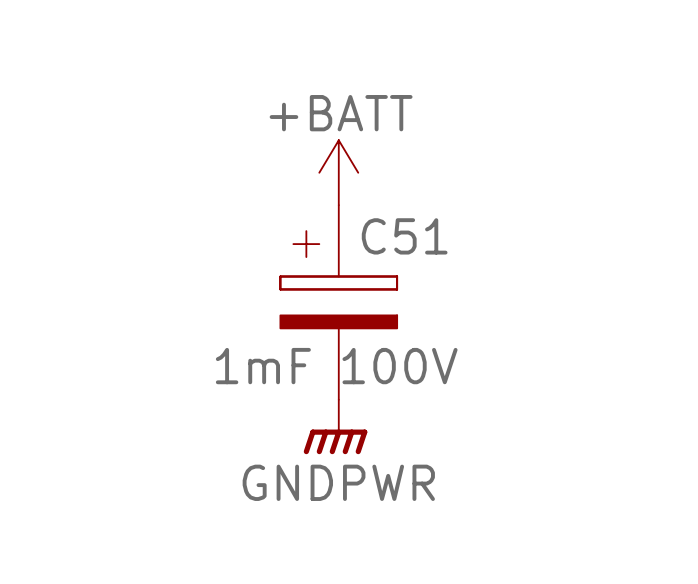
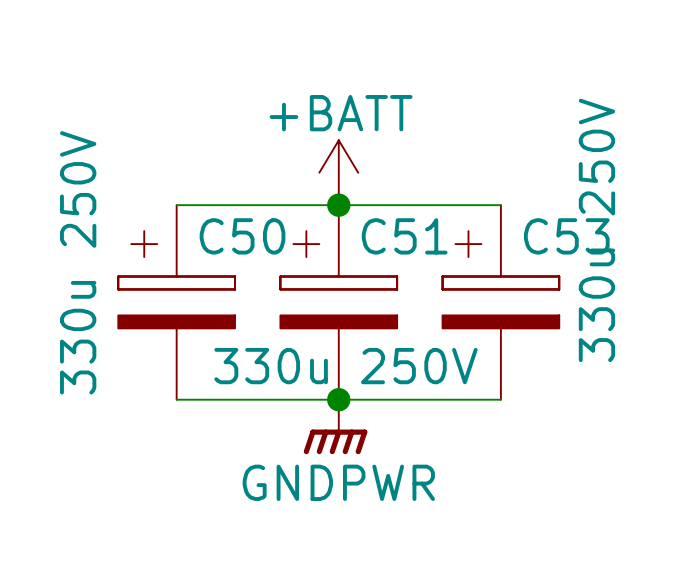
wire: none -> (176, 205) (500, 205)
junction: none -> (338, 205)
C50: none -> 330u 250V (176, 302)
C53: none -> 330u 250V (500, 302)
C51 value: 1mF 100V (336, 366) -> 330u 250V (345, 366)
wire: none -> (176, 399) (500, 399)
junction: none -> (338, 399)

